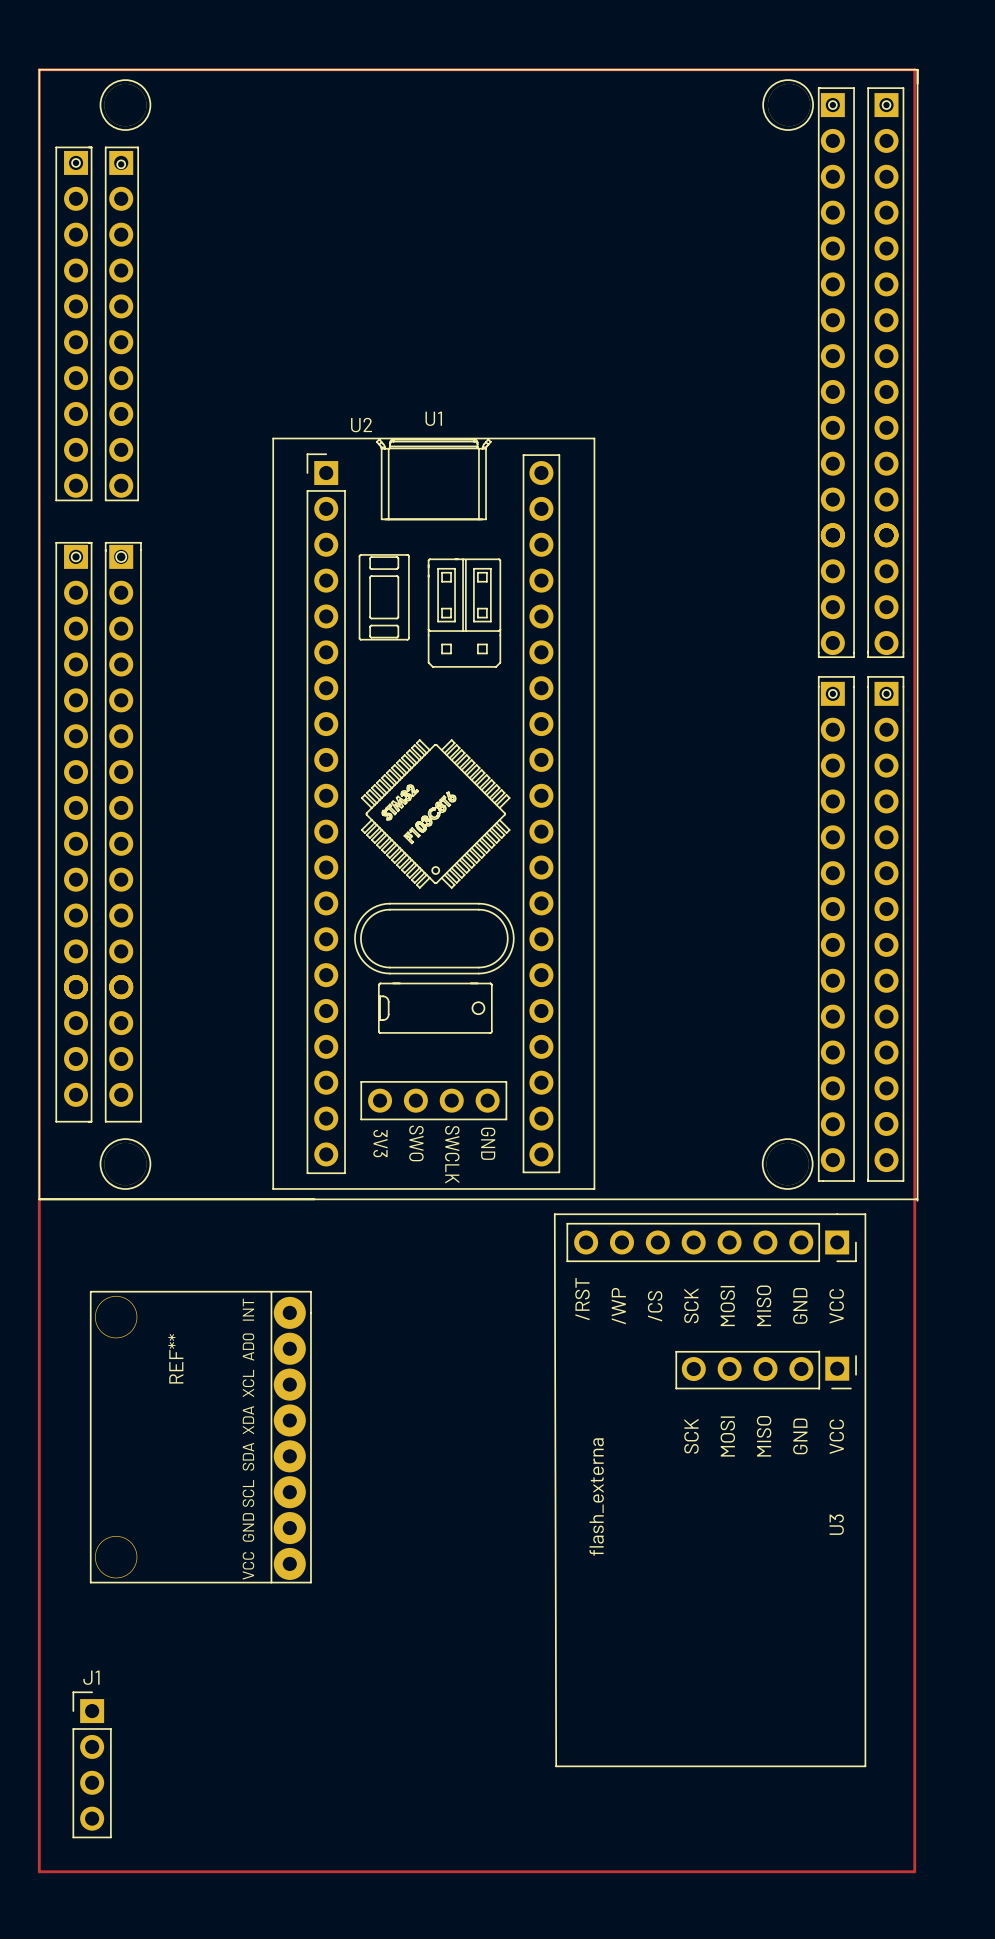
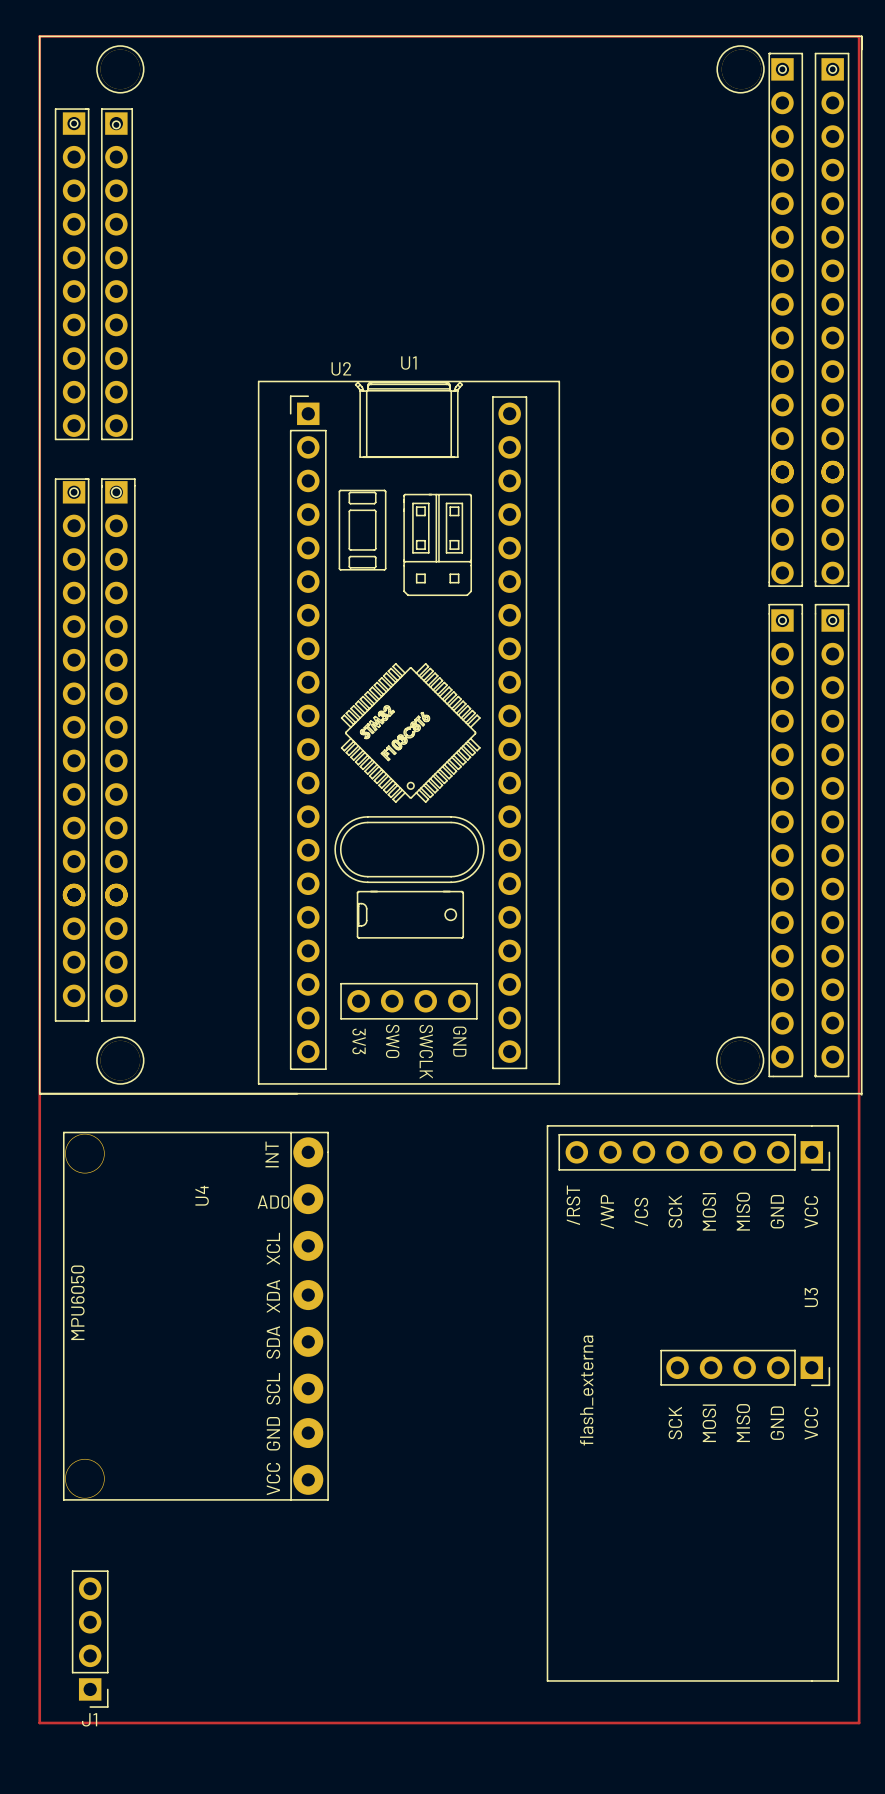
U3 footprint: [553, 1213, 867, 1768] -> [546, 1125, 840, 1682]
REF**: (200, 1437) -> none
U4: none -> (195, 1316)
U3 name position: U3 (836, 1524) -> U3 (811, 1297)
J1 rotation: 0° (92, 1764) -> 180° (90, 1639)

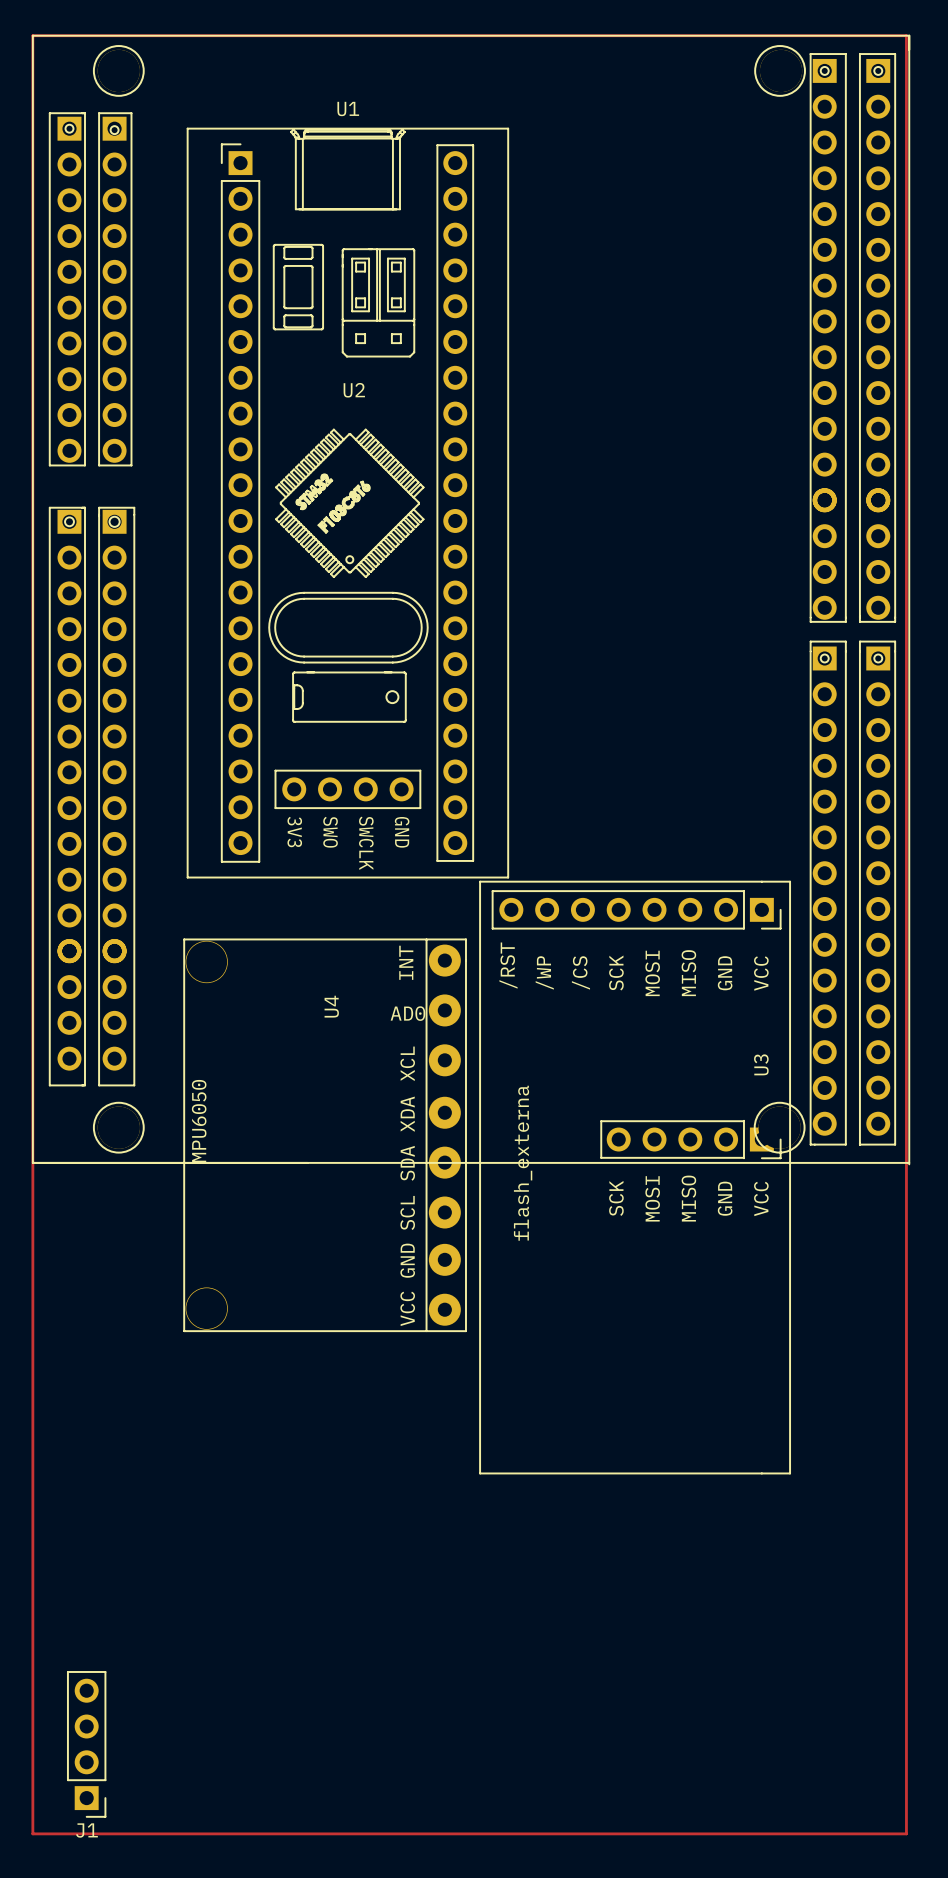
U1 position: (408, 732) -> (347, 503)
U4 position: (195, 1316) -> (325, 1135)
U3 position: (692, 1403) -> (635, 1177)

